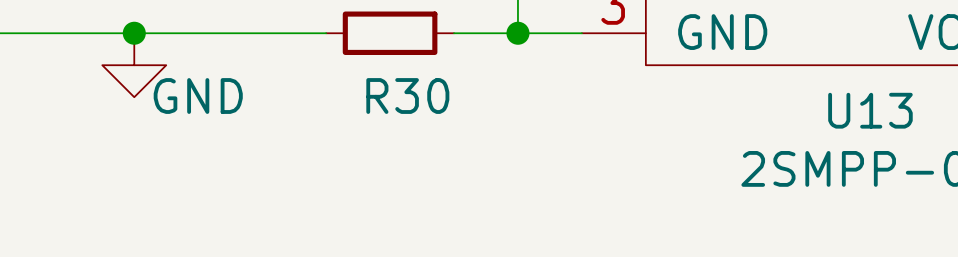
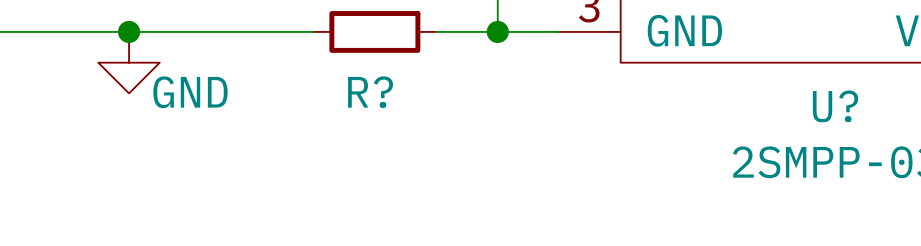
R30 name: R30 (407, 96) -> R? (370, 92)
U13 name: U13 (870, 110) -> U? (835, 106)

